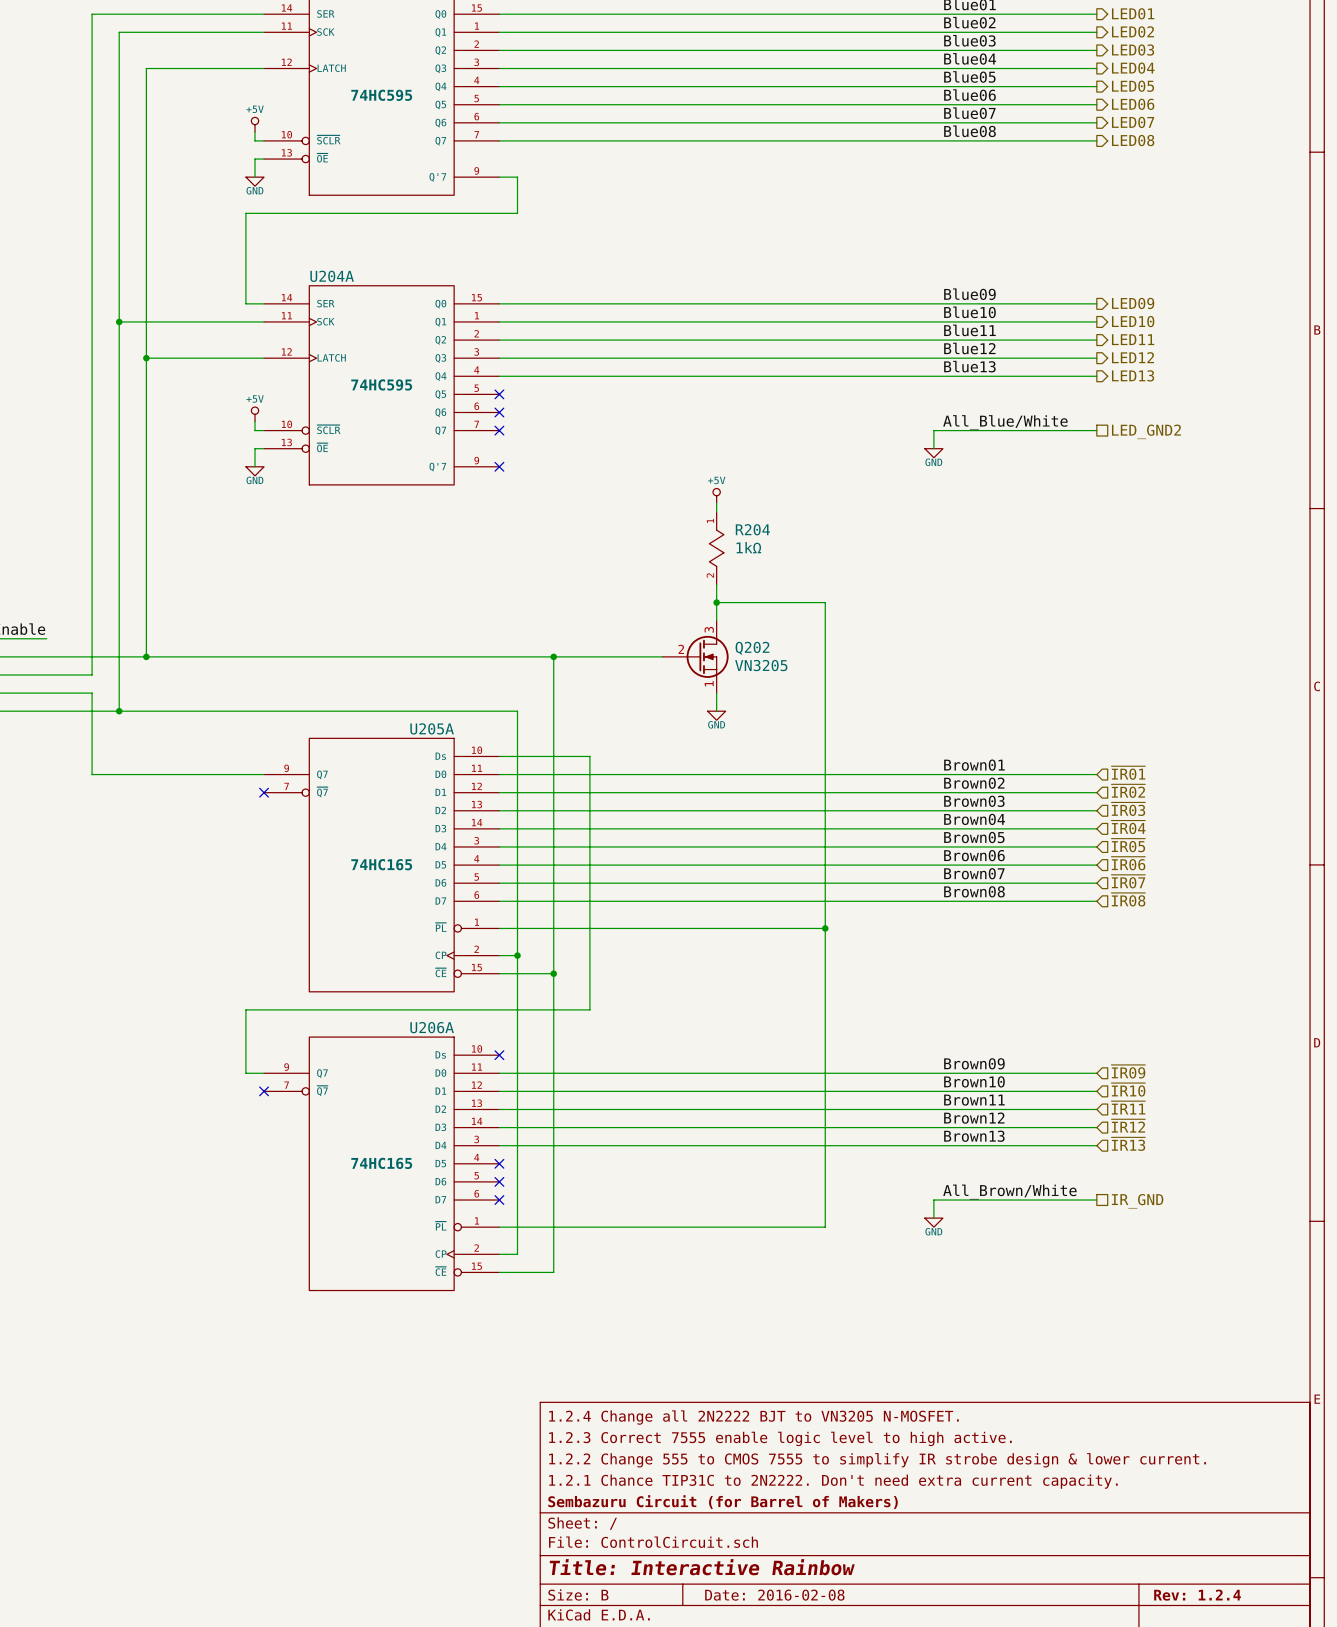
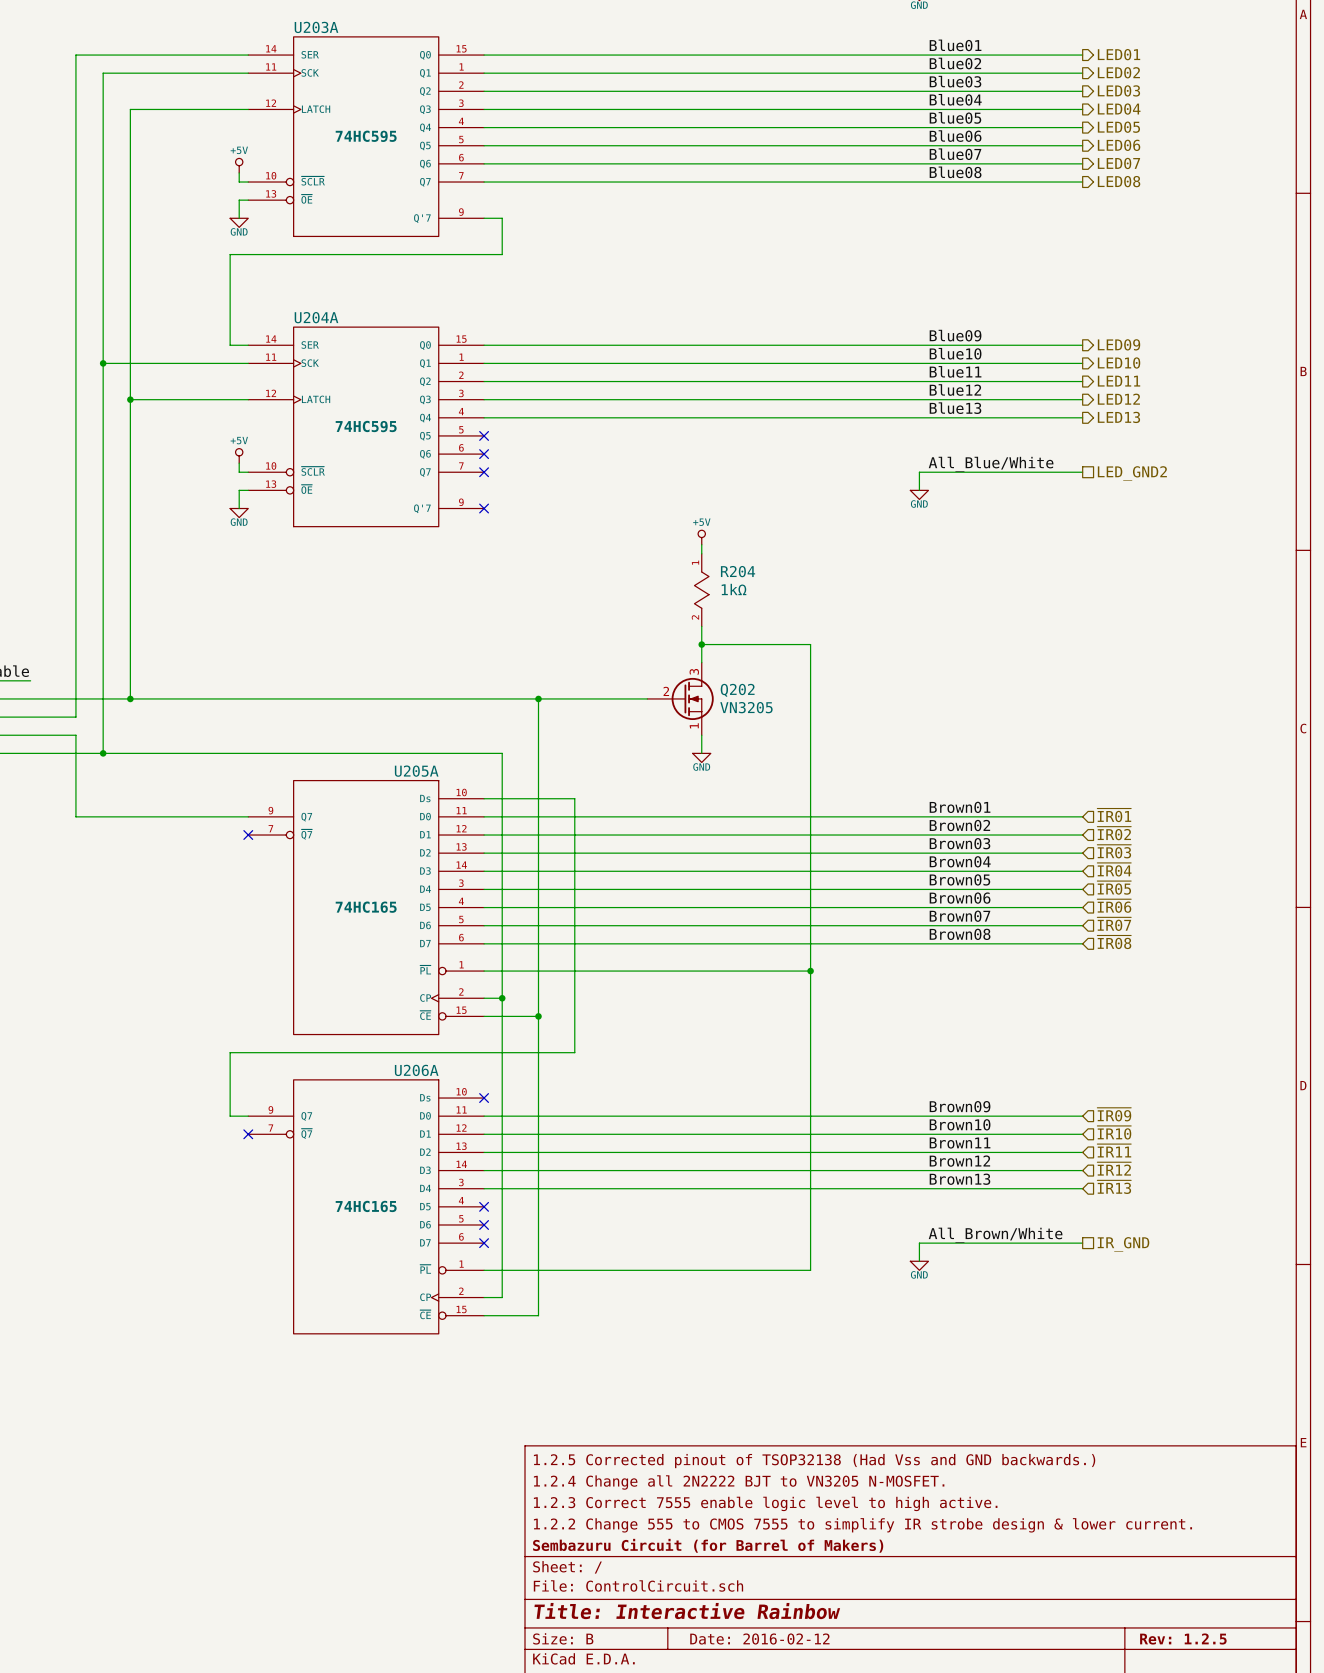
title block: 1.2.4 Change all 2N2222 BJT to VN3205 N-MOSFET. (753, 1417) -> 1.2.5 Corrected pinout of TSOP32138 (Had Vss and GND backwards.) (814, 1461)
title block: 1.2.3 Correct 7555 enable logic level to high active. (780, 1438) -> 1.2.4 Change all 2N2222 BJT to VN3205 N-MOSFET. (739, 1482)
title block: 1.2.2 Change 555 to CMOS 7555 to simplify IR strobe design & lower current. (877, 1460) -> 1.2.3 Correct 7555 enable logic level to high active. (765, 1503)
title block: 1.2.1 Chance TIP31C to 2N2222. Don't need extra current capacity. (833, 1481) -> 1.2.2 Change 555 to CMOS 7555 to simplify IR strobe design & lower current. (862, 1525)
title block: Date: 2016-02-08 (774, 1595) -> Date: 2016-02-12 (759, 1639)
title block: Rev: 1.2.4 (1197, 1595) -> Rev: 1.2.5 (1183, 1639)

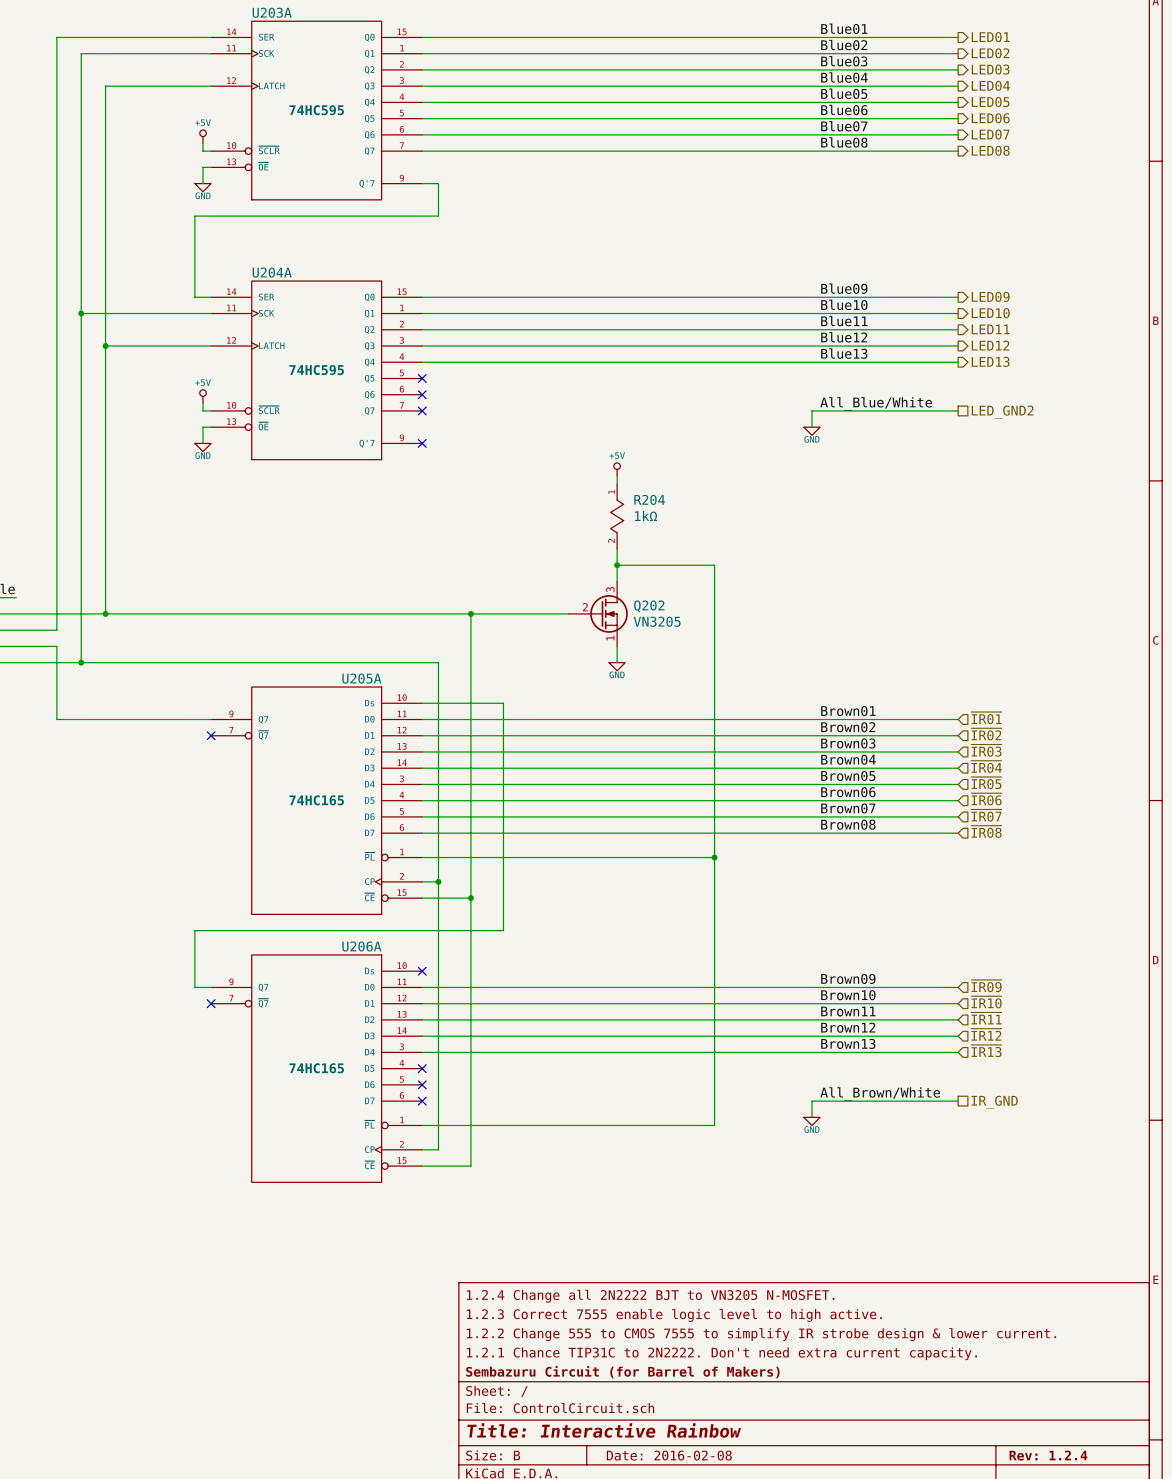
title block: 1.2.5 Corrected pinout of TSOP32138 (Had Vss and GND backwards.) (814, 1461) -> 1.2.4 Change all 2N2222 BJT to VN3205 N-MOSFET. (650, 1296)
title block: 1.2.4 Change all 2N2222 BJT to VN3205 N-MOSFET. (739, 1482) -> 1.2.3 Correct 7555 enable logic level to high active. (674, 1315)
title block: 1.2.3 Correct 7555 enable logic level to high active. (765, 1503) -> 1.2.2 Change 555 to CMOS 7555 to simplify IR strobe design & lower current. (761, 1334)
title block: 1.2.2 Change 555 to CMOS 7555 to simplify IR strobe design & lower current. (862, 1525) -> 1.2.1 Chance TIP31C to 2N2222. Don't need extra current capacity. (721, 1353)
title block: Date: 2016-02-12 (759, 1639) -> Date: 2016-02-08 (669, 1455)
title block: Rev: 1.2.5 (1183, 1639) -> Rev: 1.2.4 (1048, 1455)

